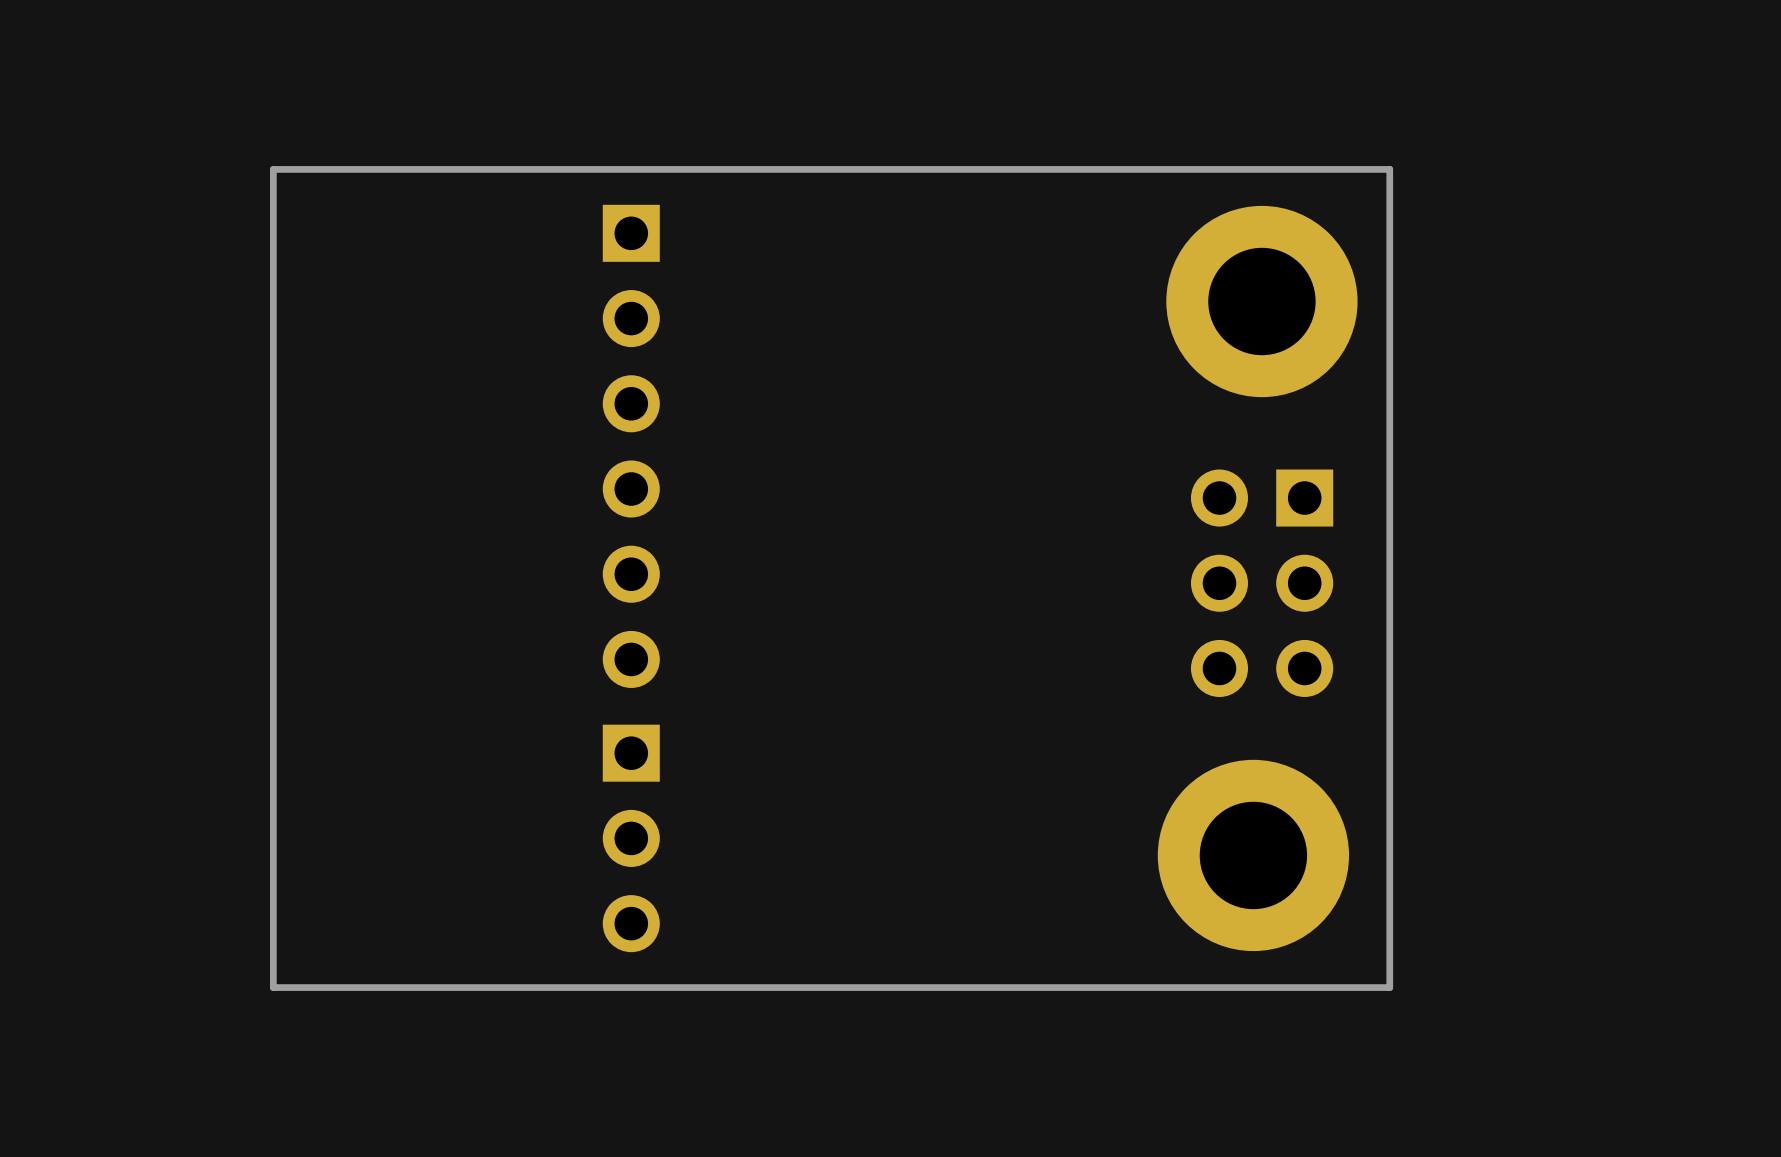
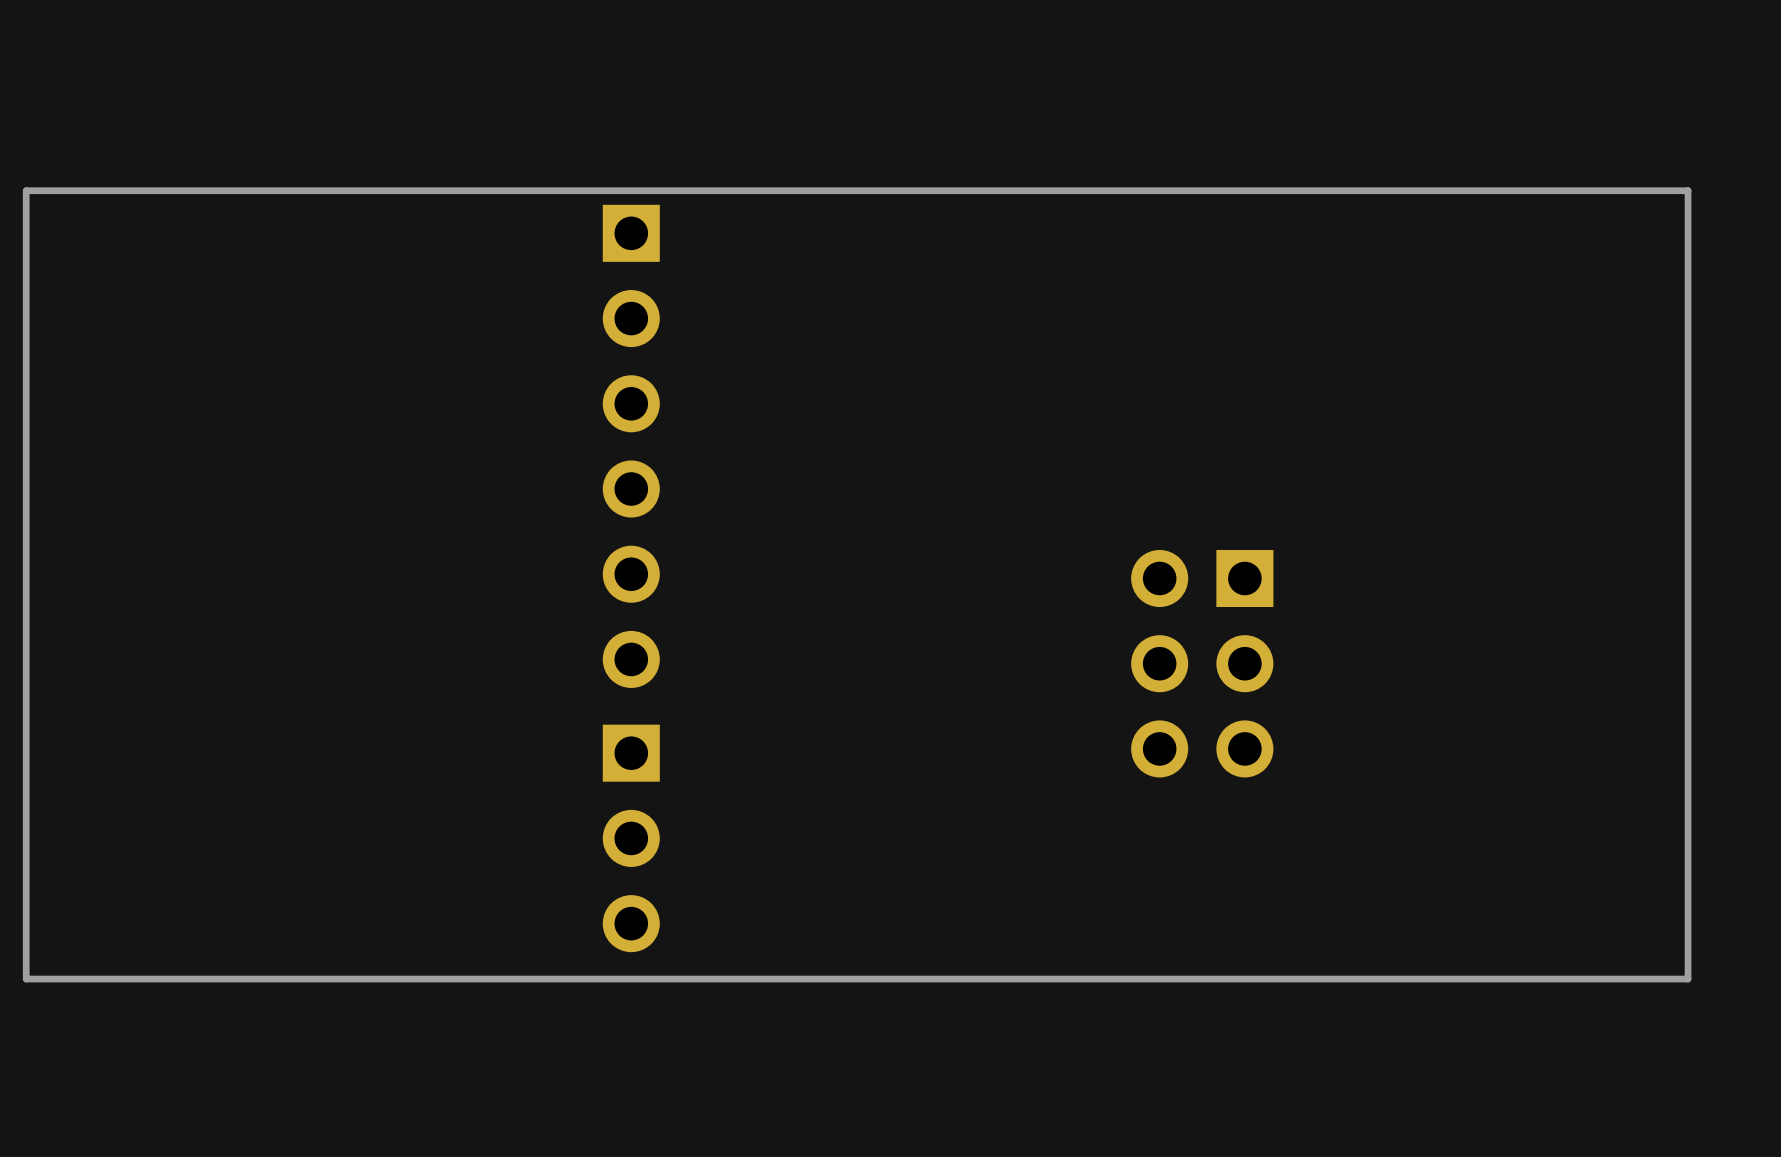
board edge: (1389, 169) (273, 169) (273, 987) (1389, 987) (1389, 169) -> (1688, 190) (1688, 979) (26, 979) (26, 190) (1688, 190)
part: (1261, 301) -> none
part position: (1262, 583) -> (1202, 663)
part: (1253, 855) -> none

